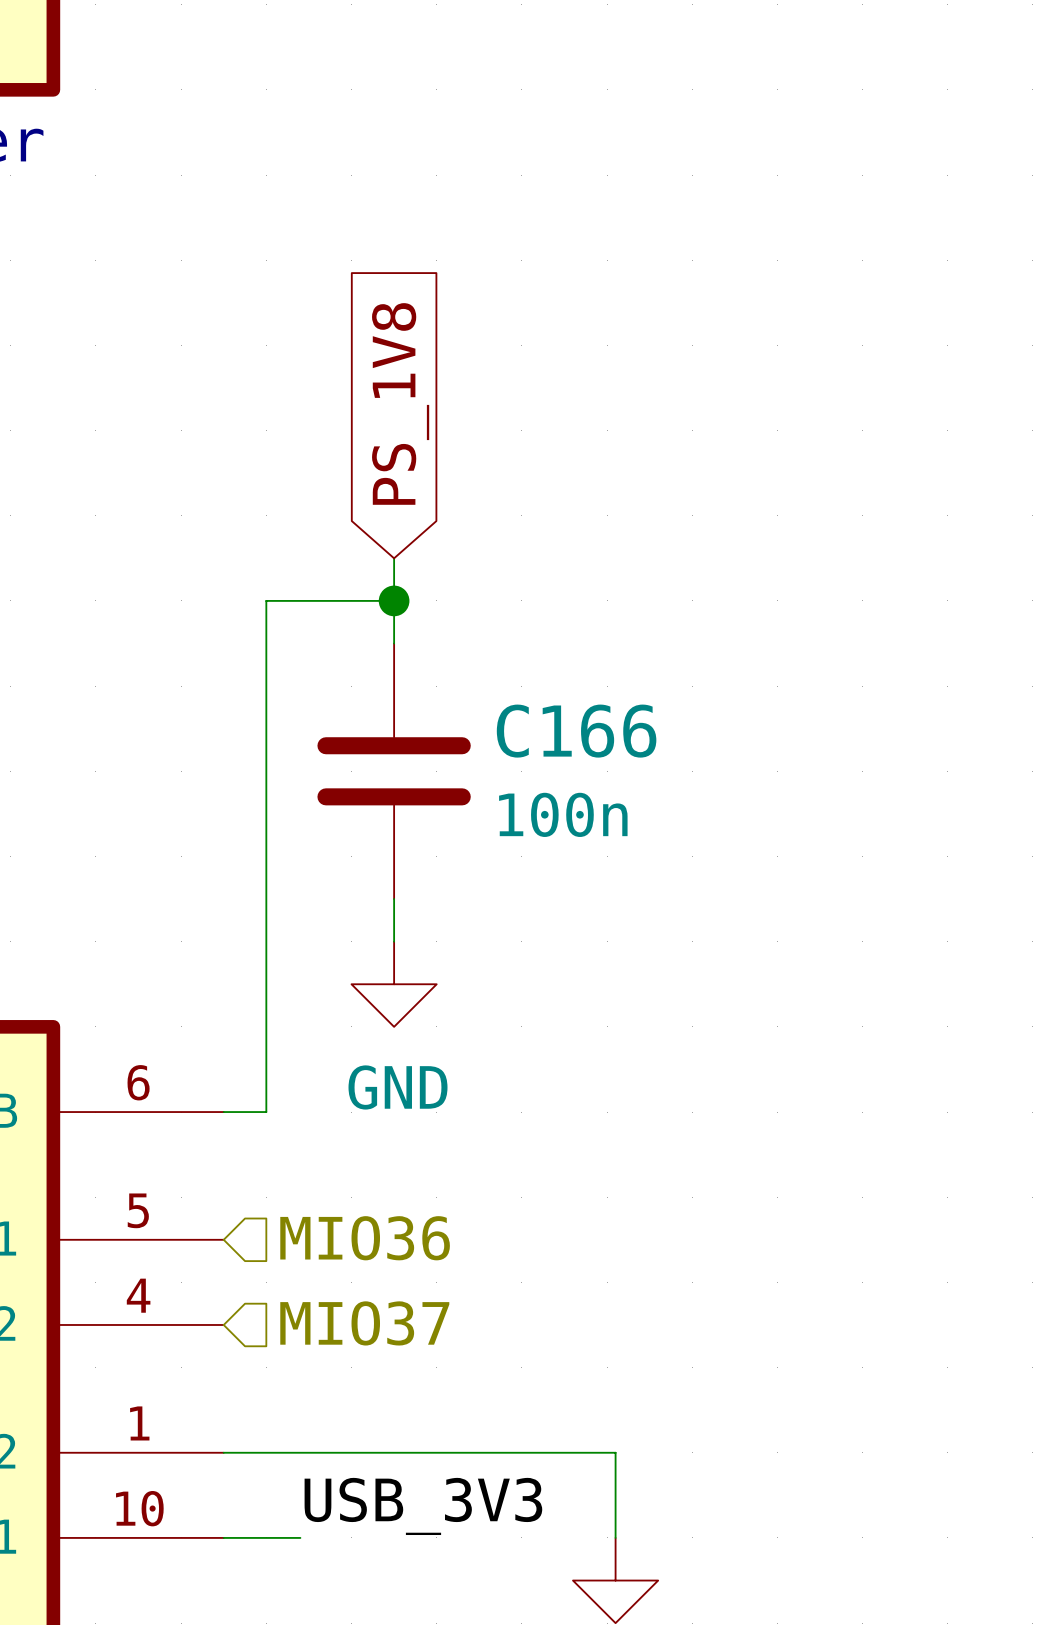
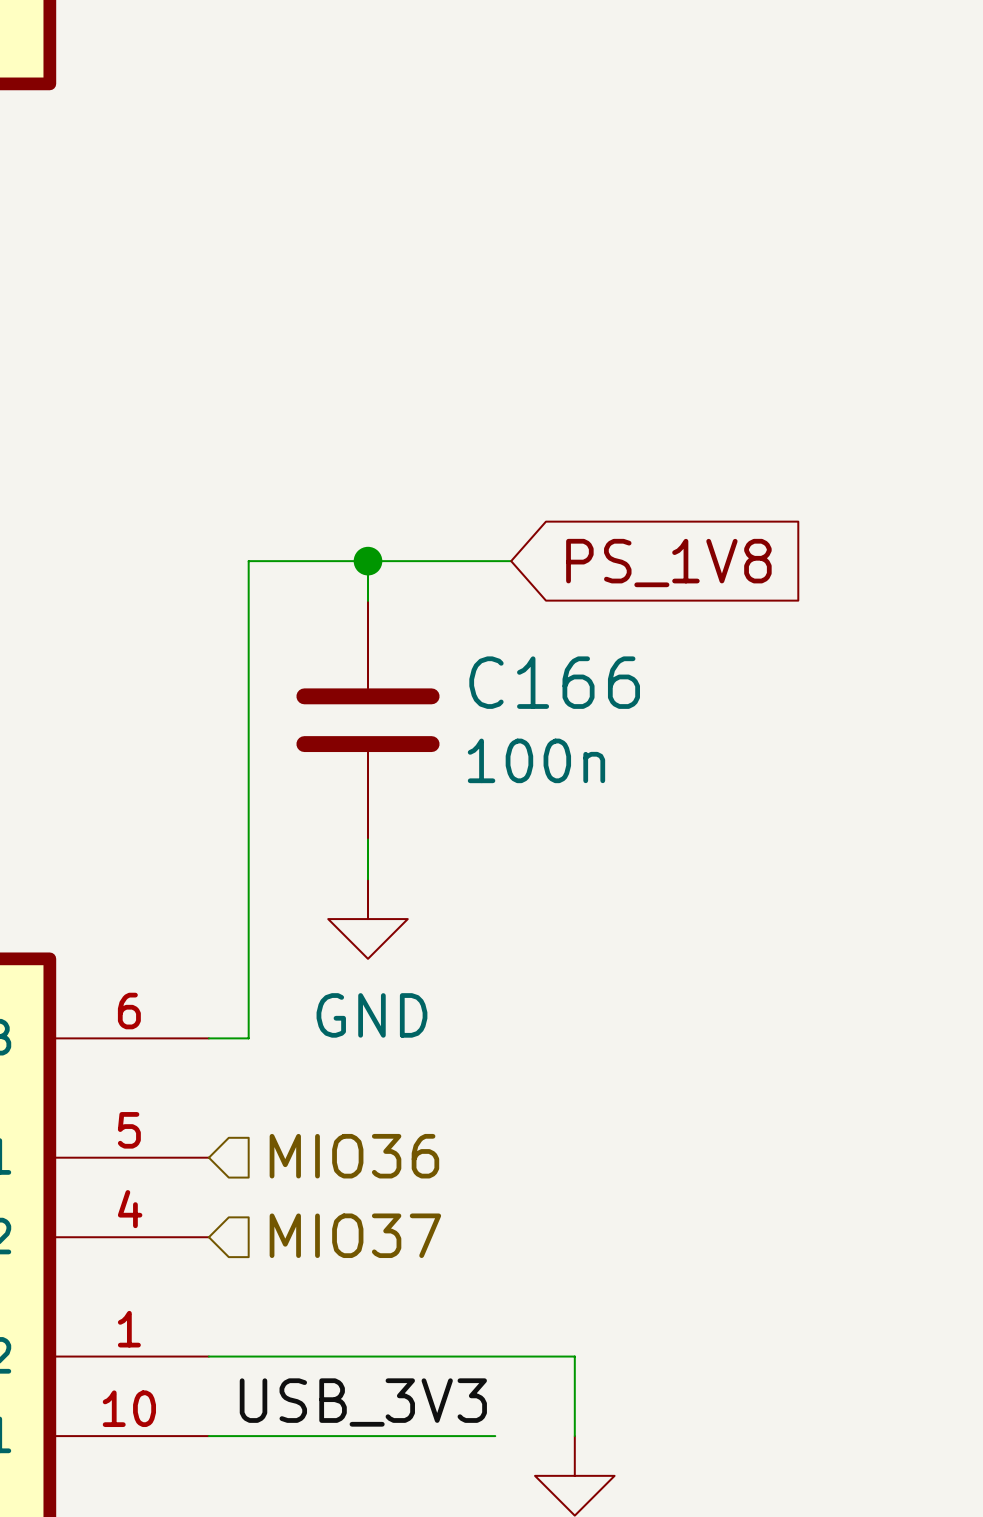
global label rotation: 0° (400, 403) -> 90° clockwise (668, 563)
global label position: PS_1V8 (400, 403) -> PS_1V8 (668, 563)
wire: (394, 558) (394, 600) -> (511, 561) (368, 561)
label position: USB_3V3 (423, 1506) -> USB_3V3 (363, 1402)
wire: none -> (280, 1436) (495, 1436)

